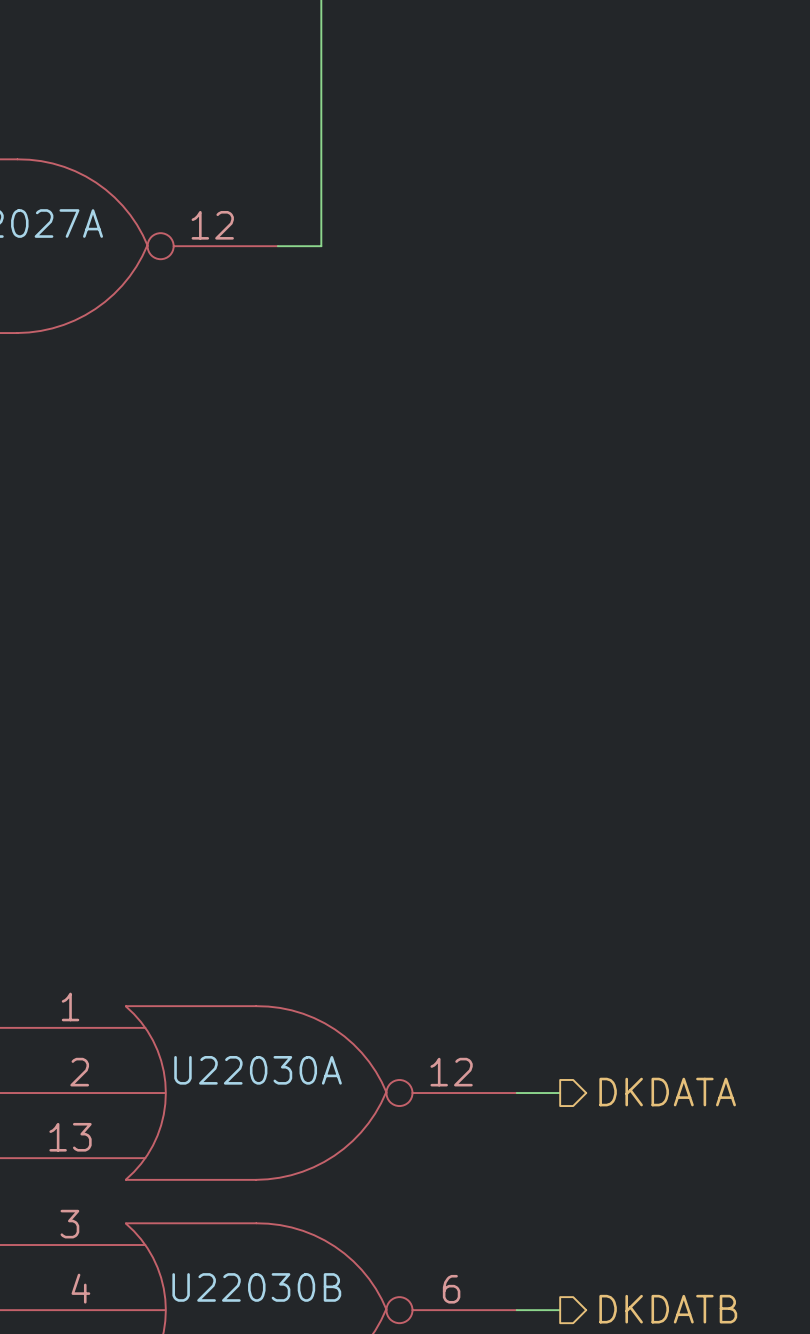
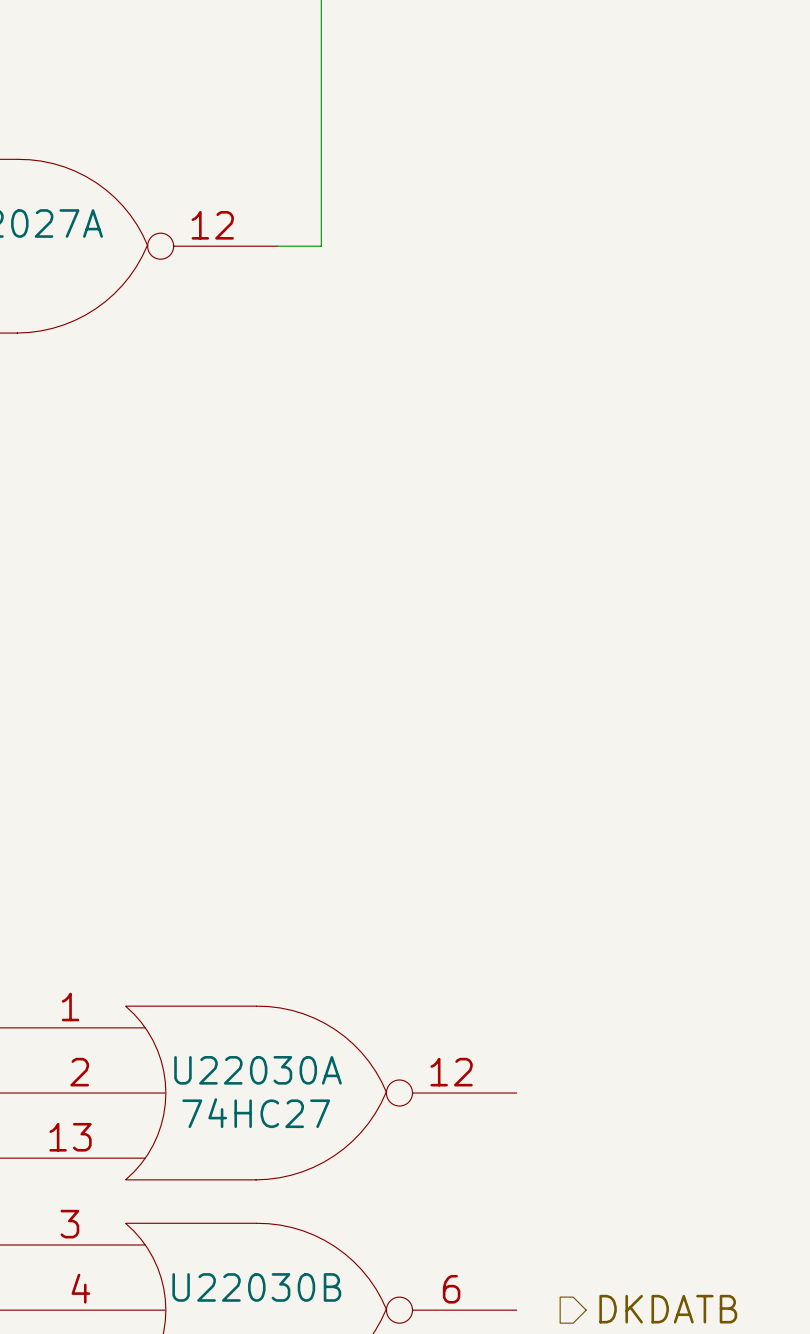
hierarchical label: DKDATA (667, 1092) -> none
wire: (516, 1093) (560, 1093) -> none
U22030A value: none -> 74HC27 (256, 1113)
wire: (516, 1310) (560, 1310) -> none

